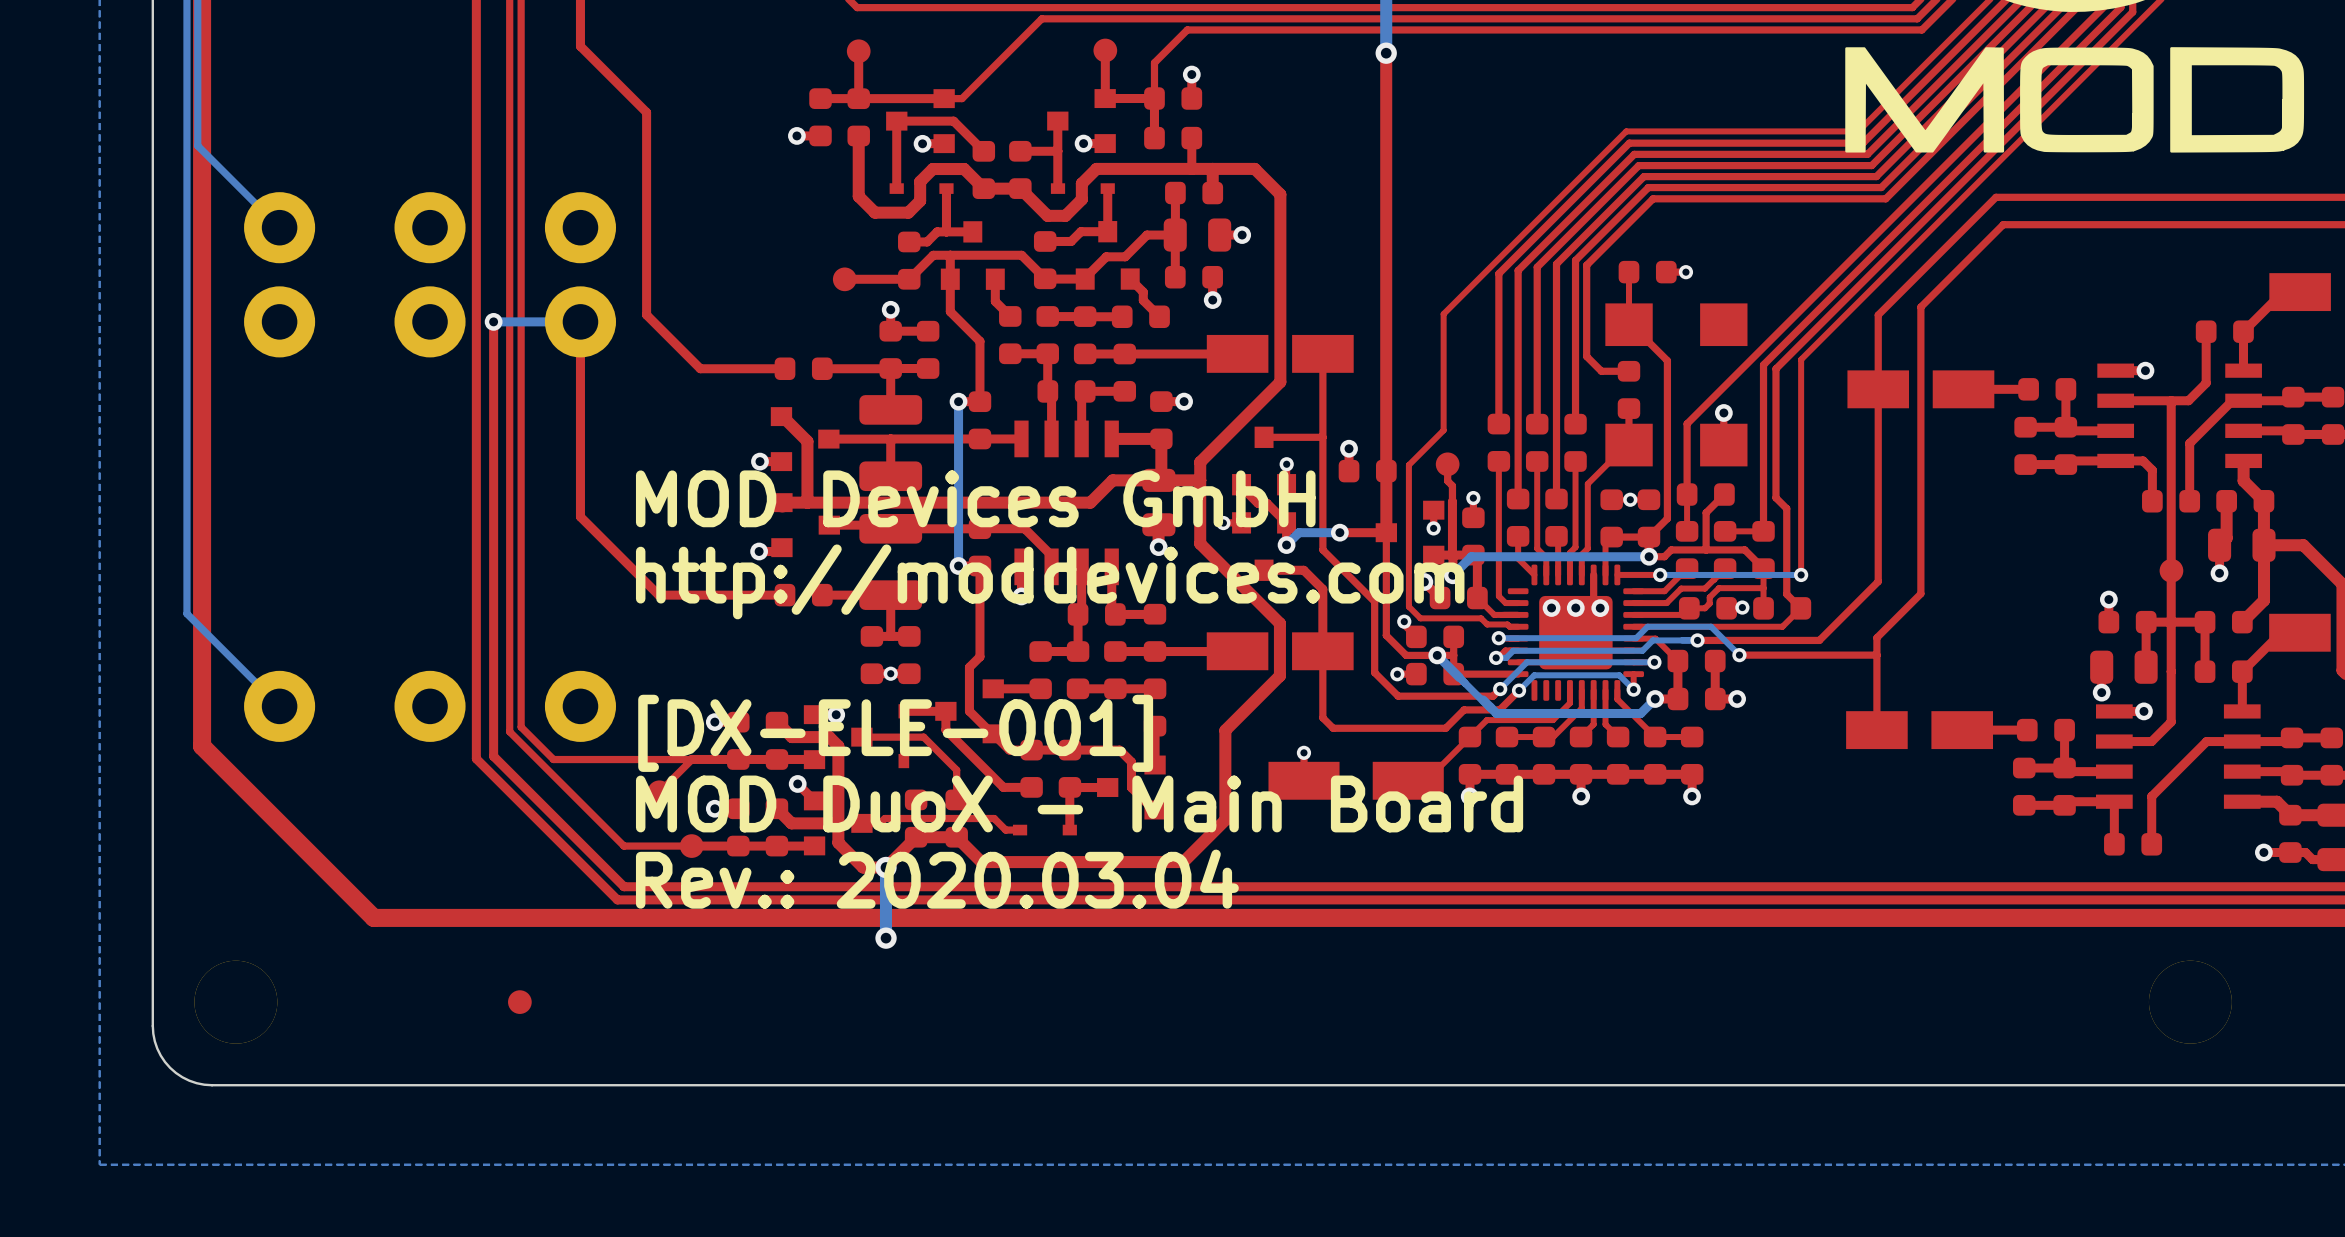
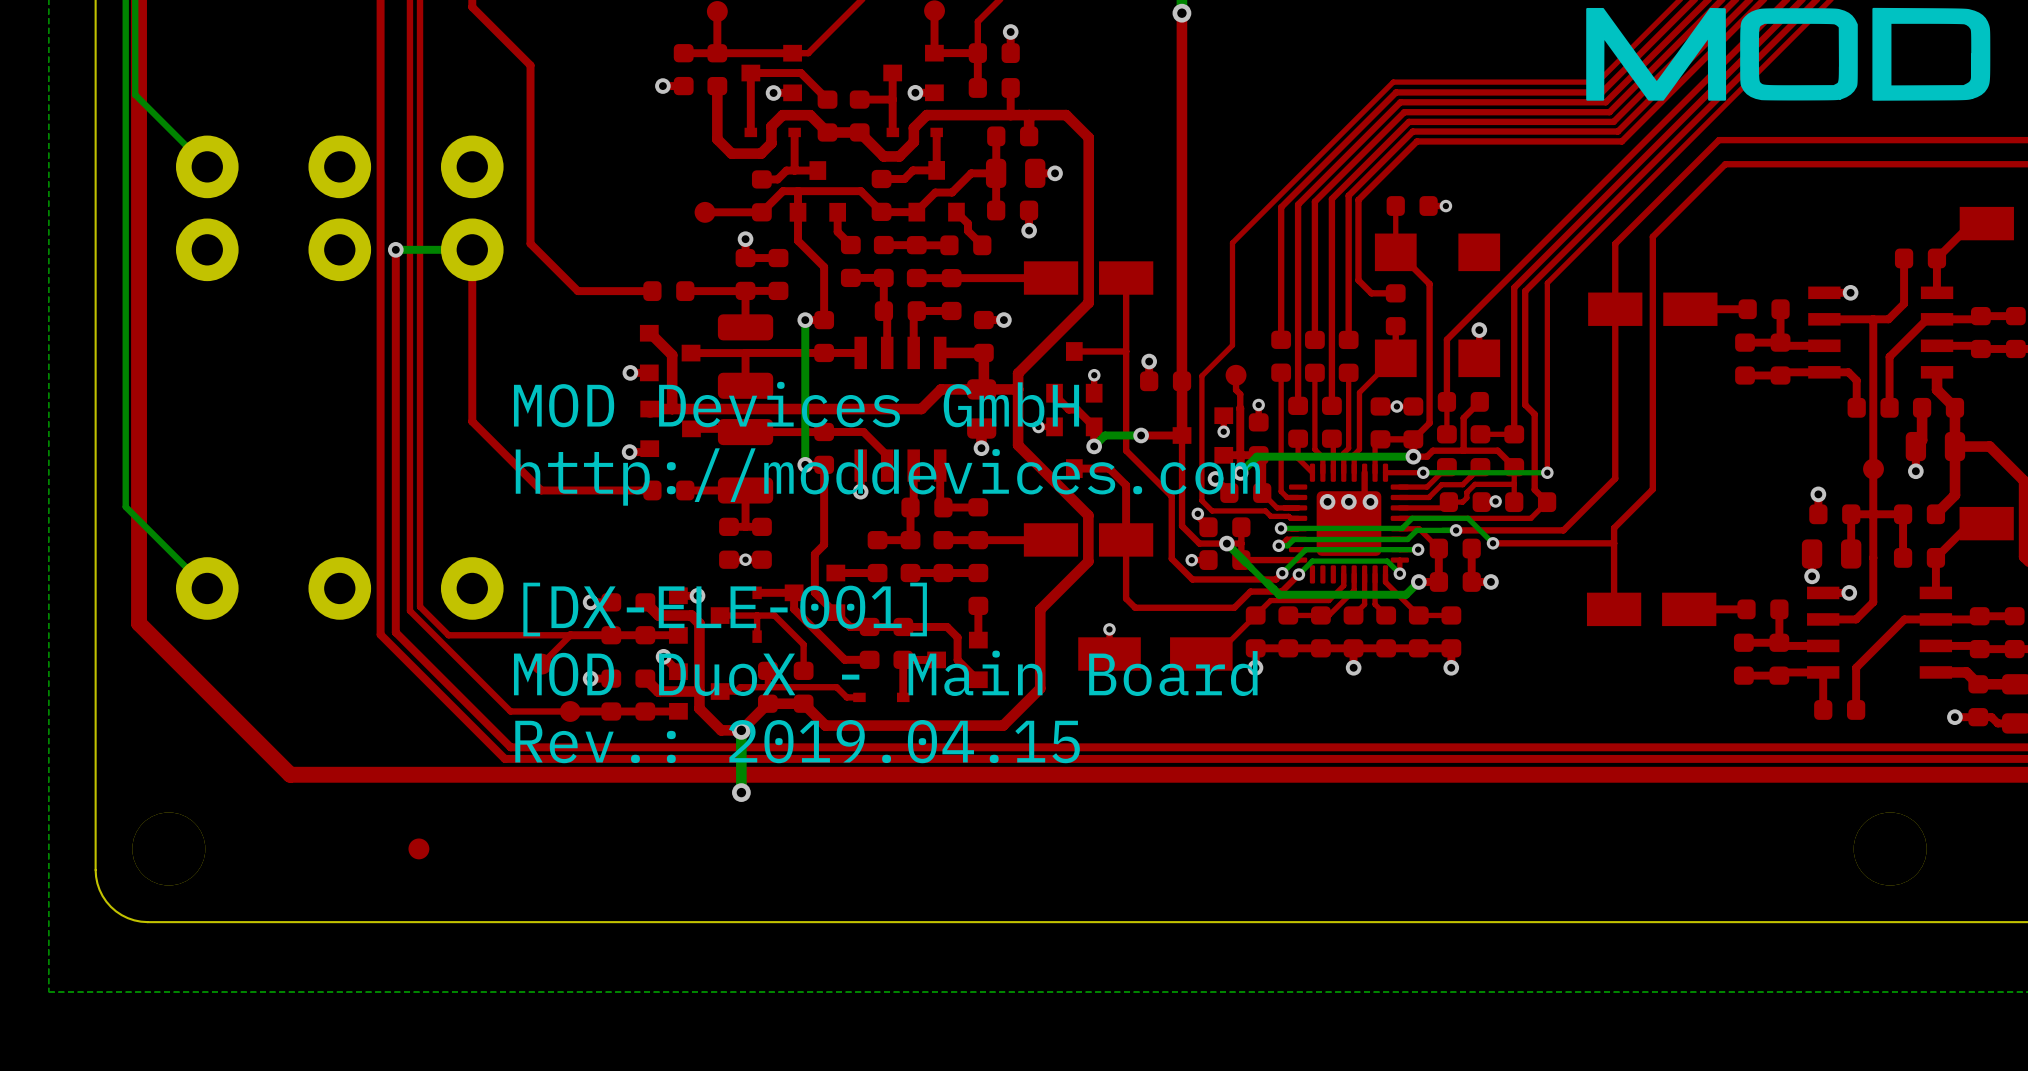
text: Rev.: 2020.03.04 (937, 879) -> Rev.: 2019.04.15 (797, 741)

